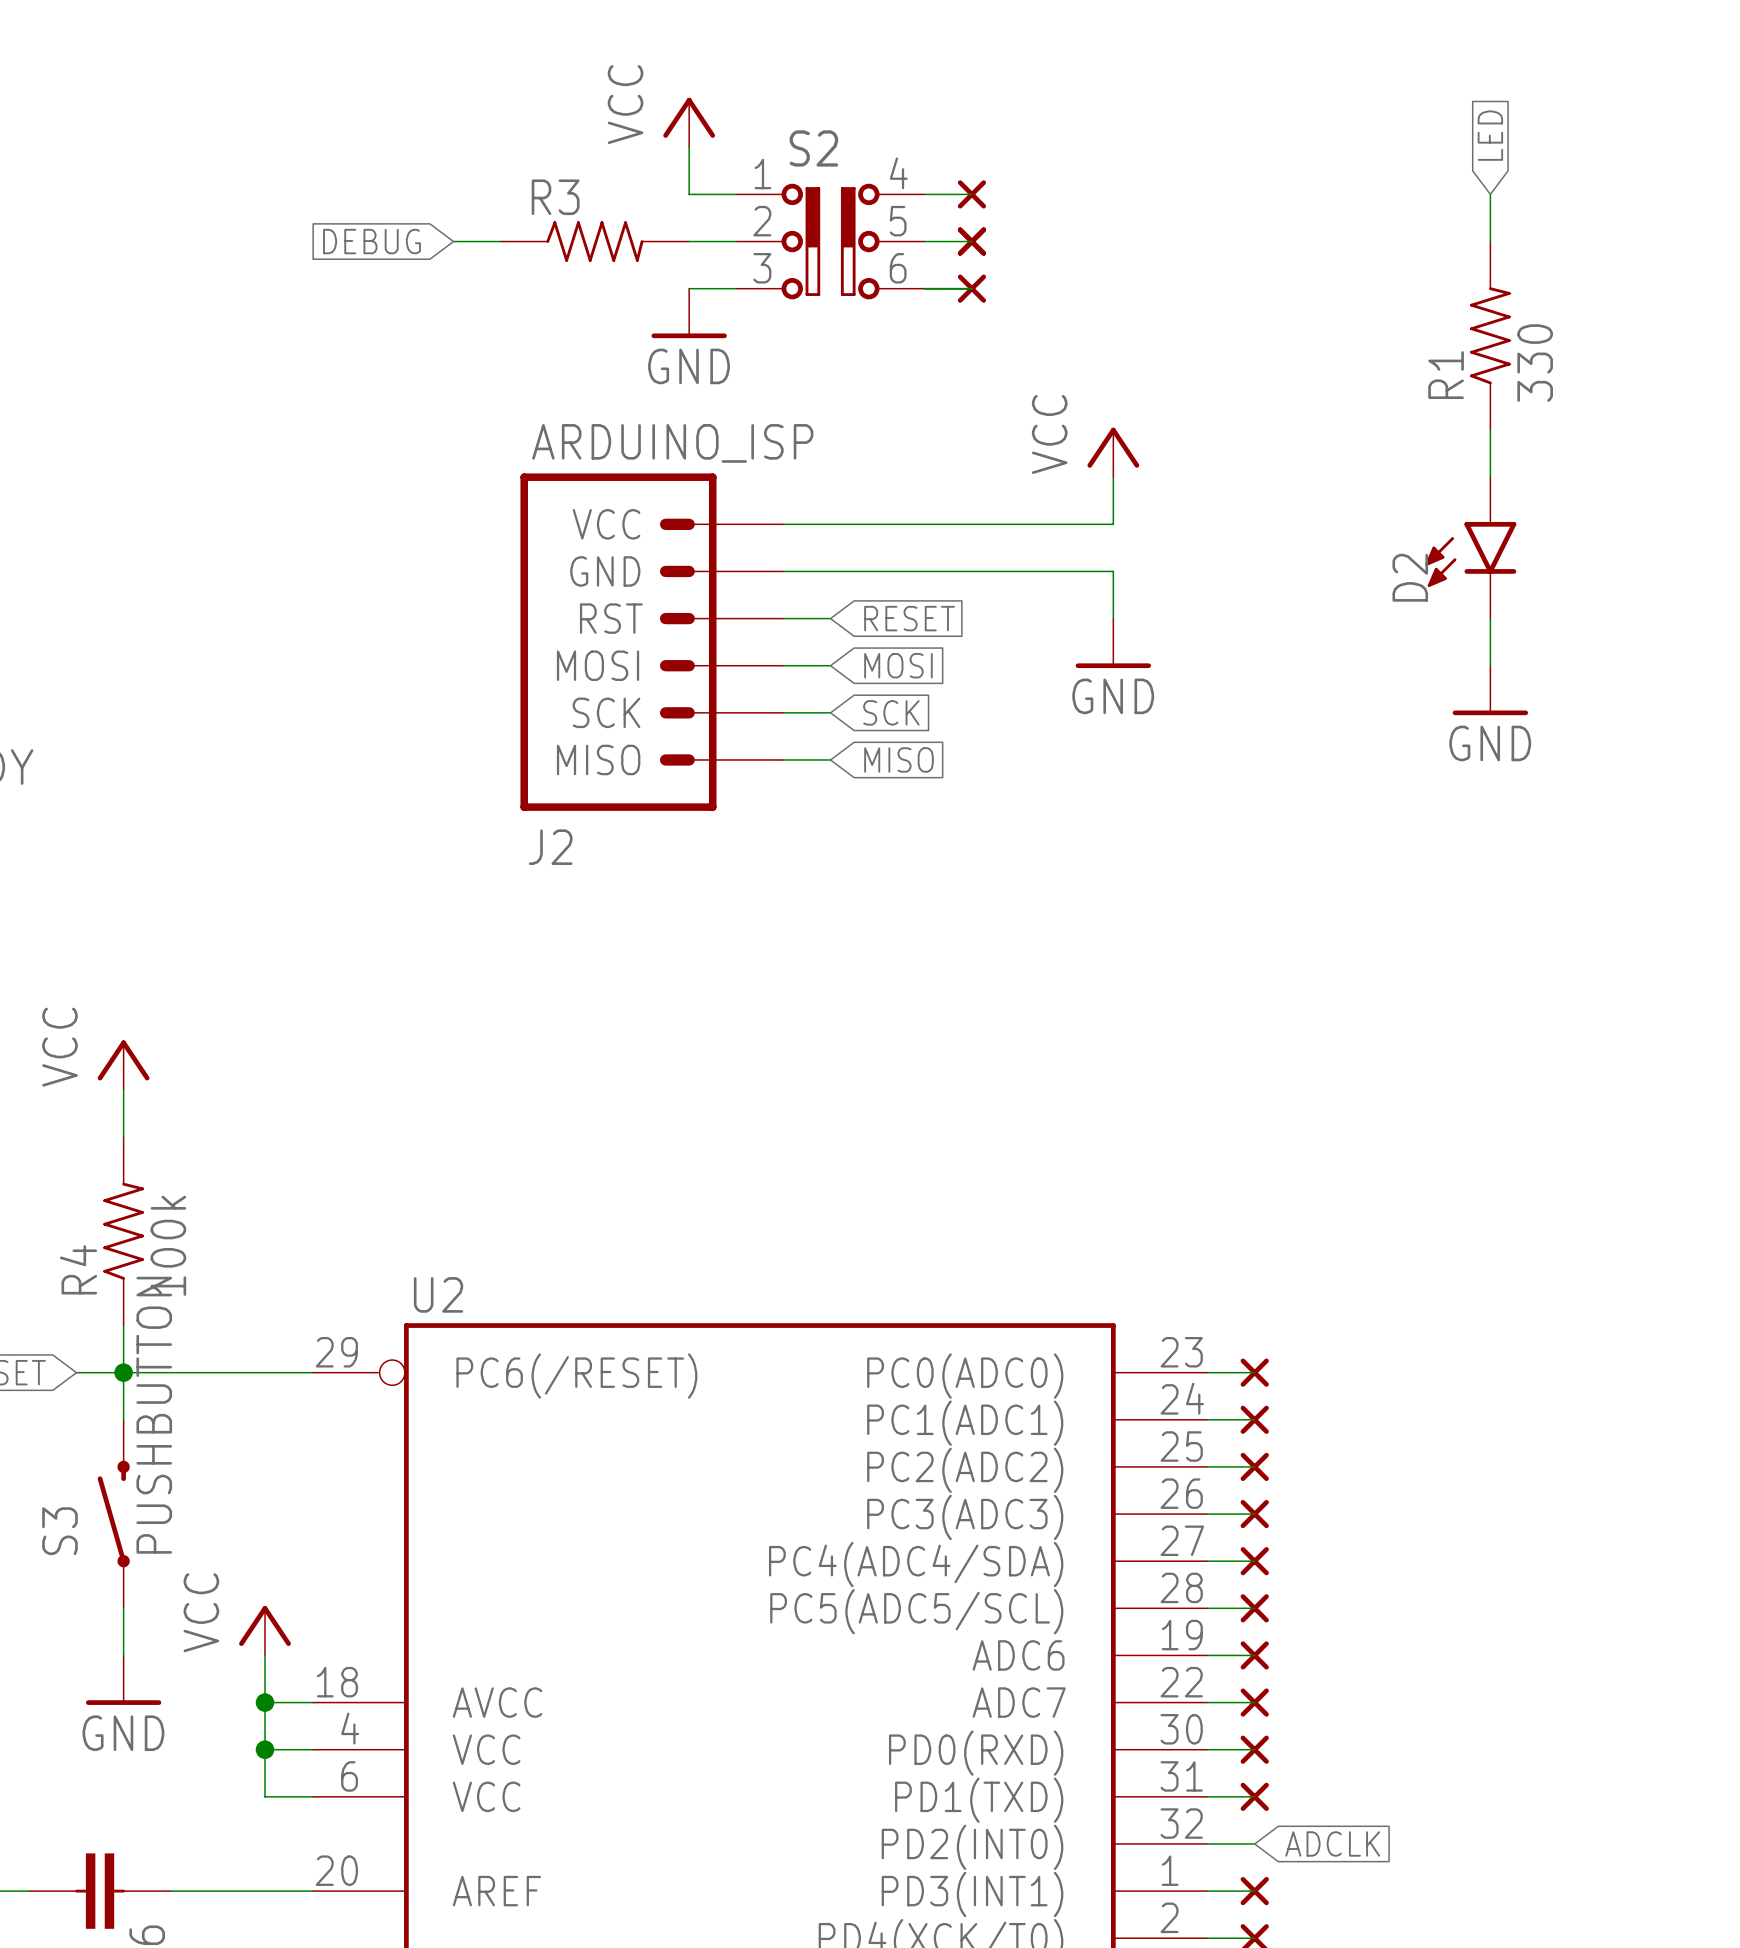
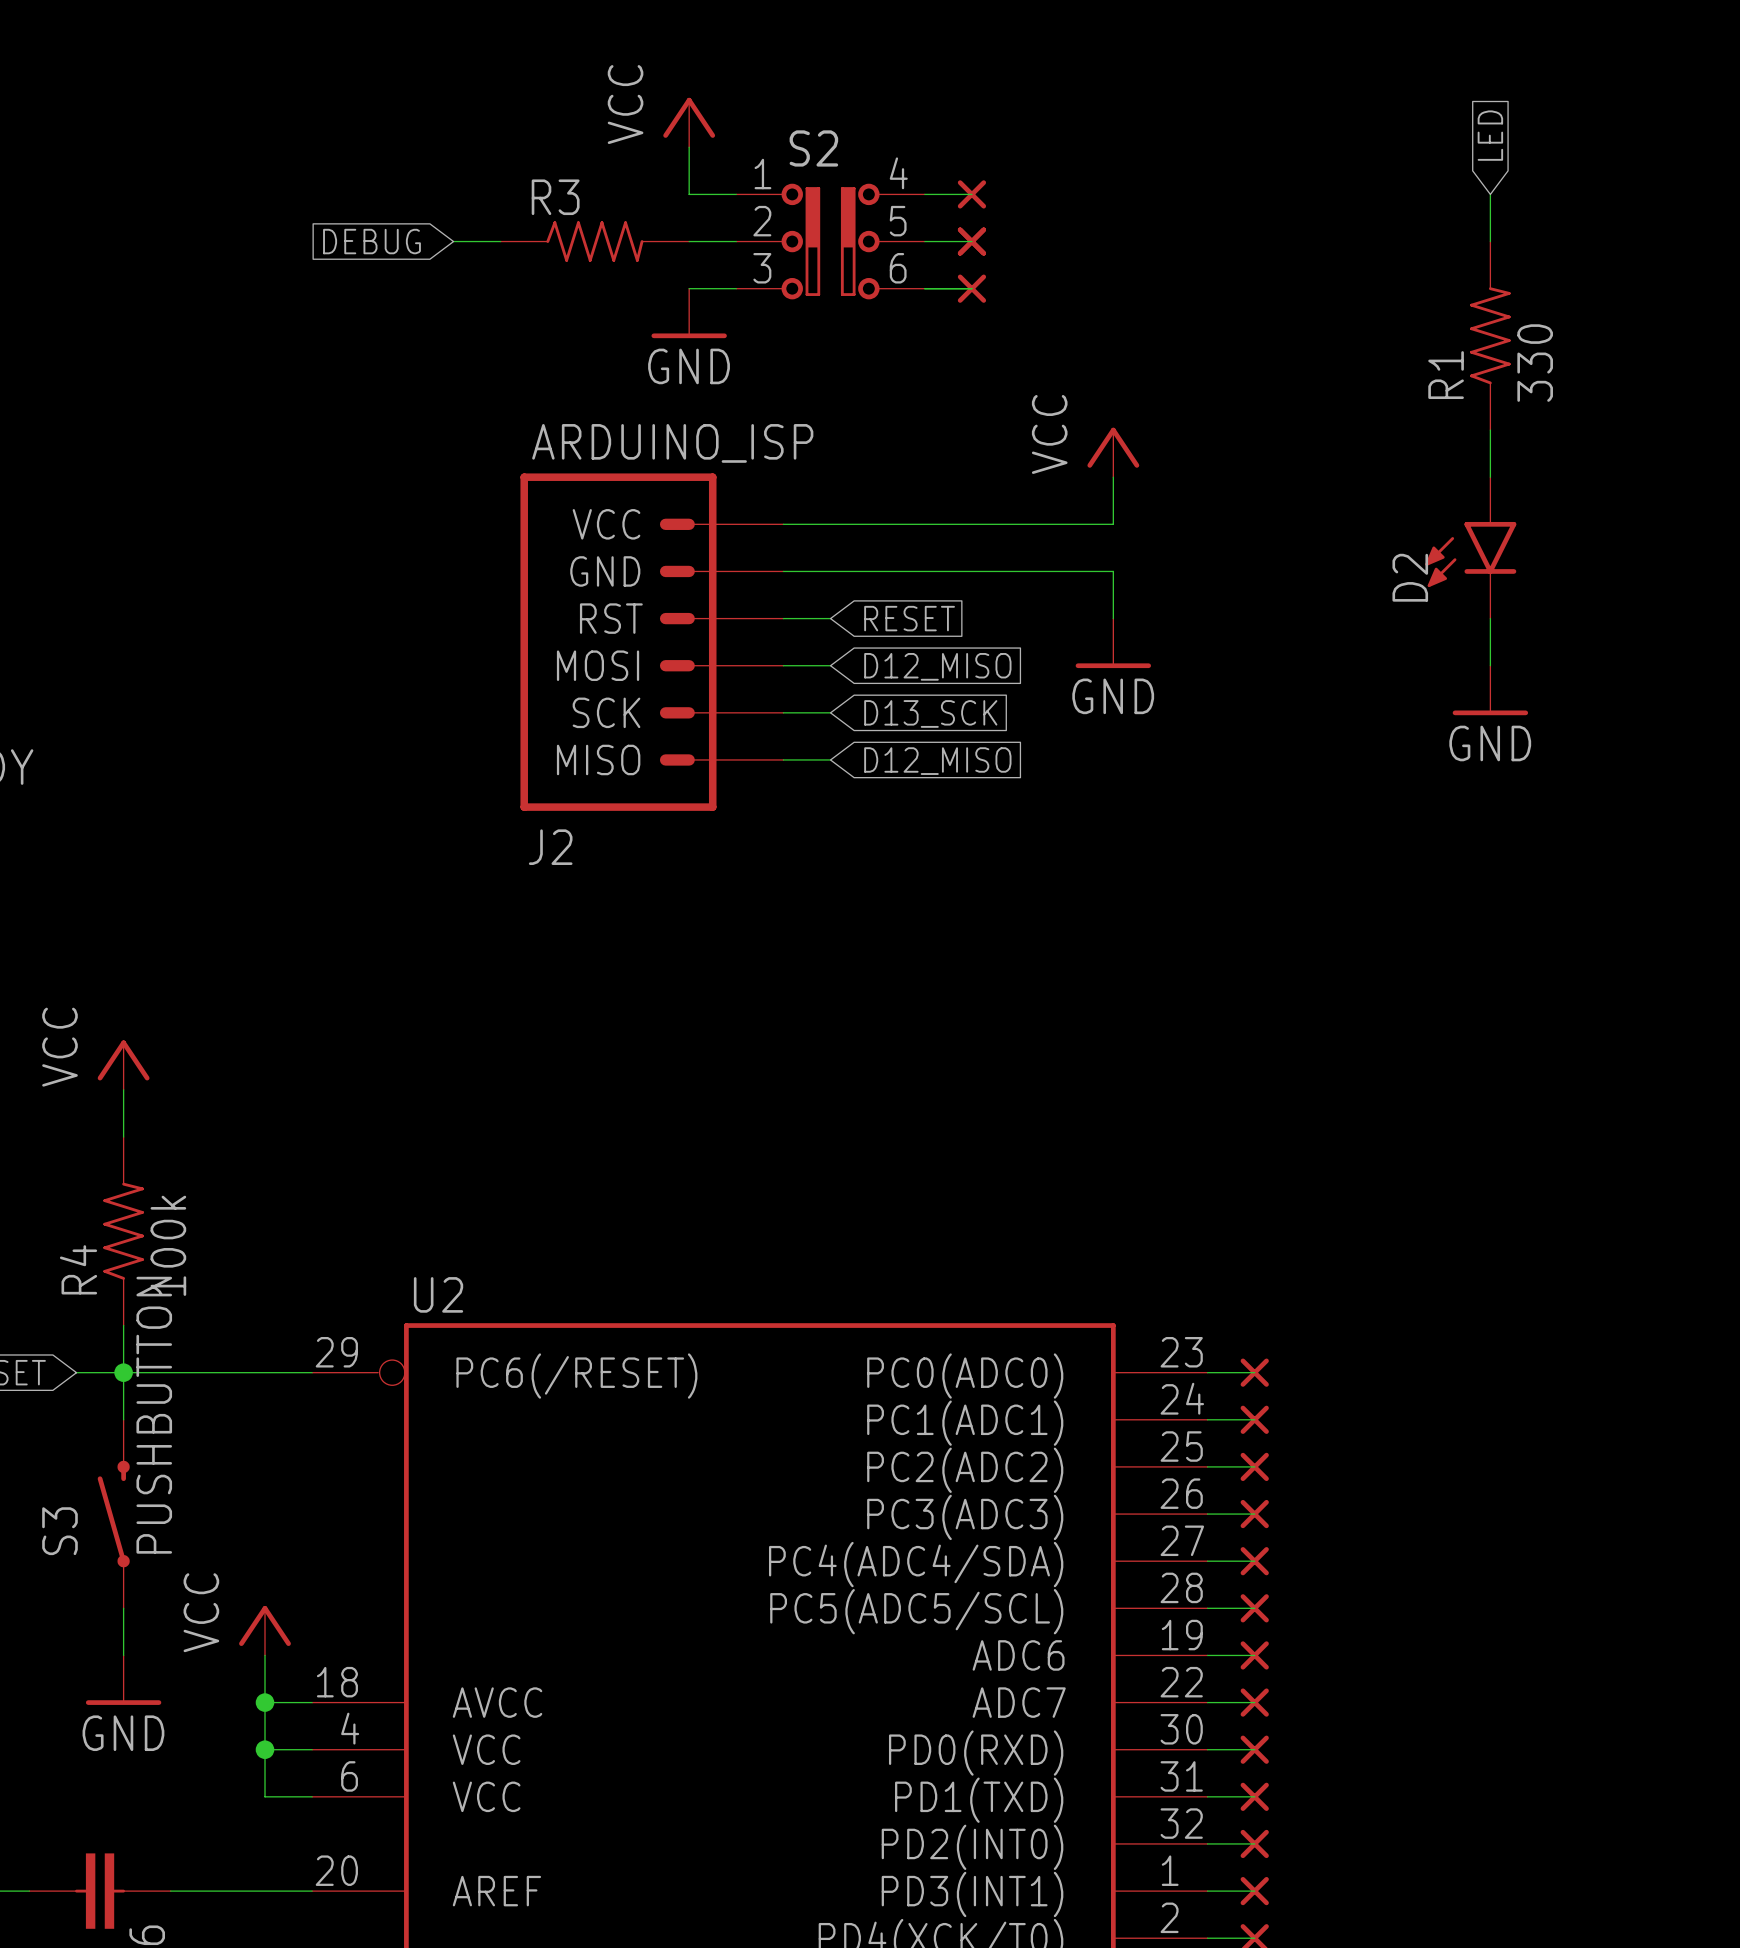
global label: MOSI (898, 665) -> D12_MISO (937, 666)
global label: SCK (891, 712) -> D13_SCK (930, 713)
global label: MISO (898, 759) -> D12_MISO (937, 761)
part: none -> (1254, 1843)
global label: ADCLK (1332, 1843) -> none

